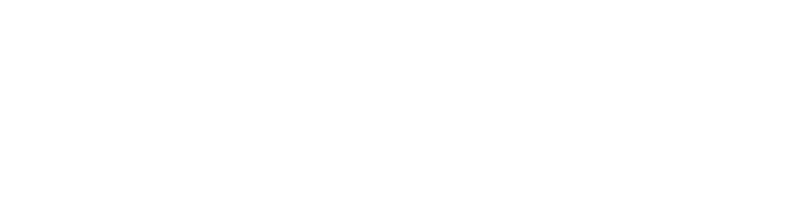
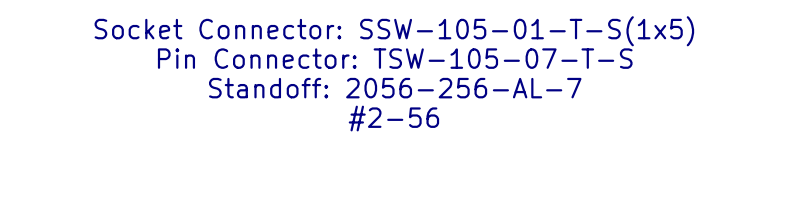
text: none -> Socket Connector: SSW-105-01-T-S(1x5) (394, 31)
text: none -> Pin Connector: TSW-105-07-T-S (395, 58)
text: none -> Standoff: 2056-256-AL-7 (395, 88)
text: none -> #2-56 (393, 118)

